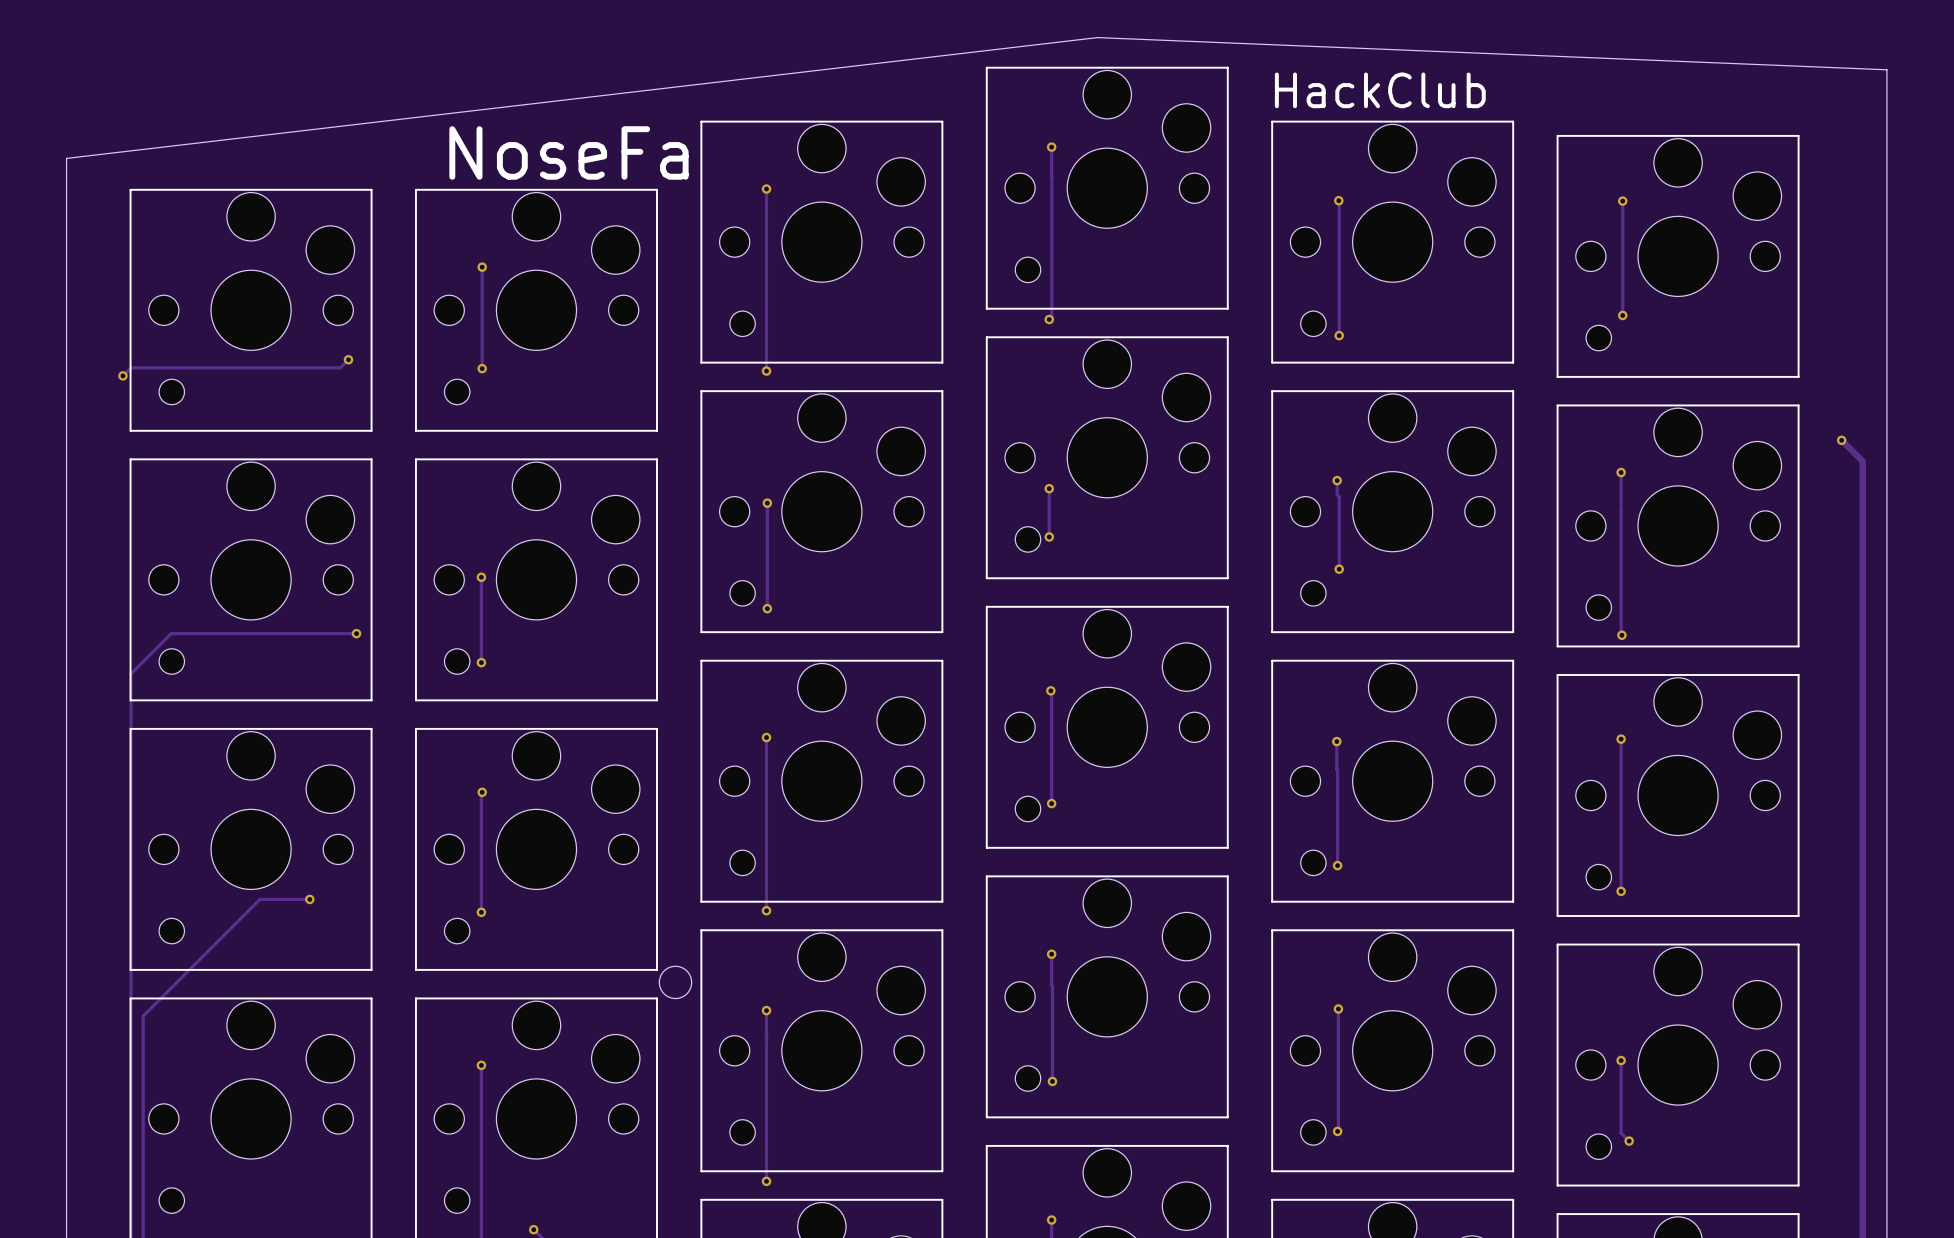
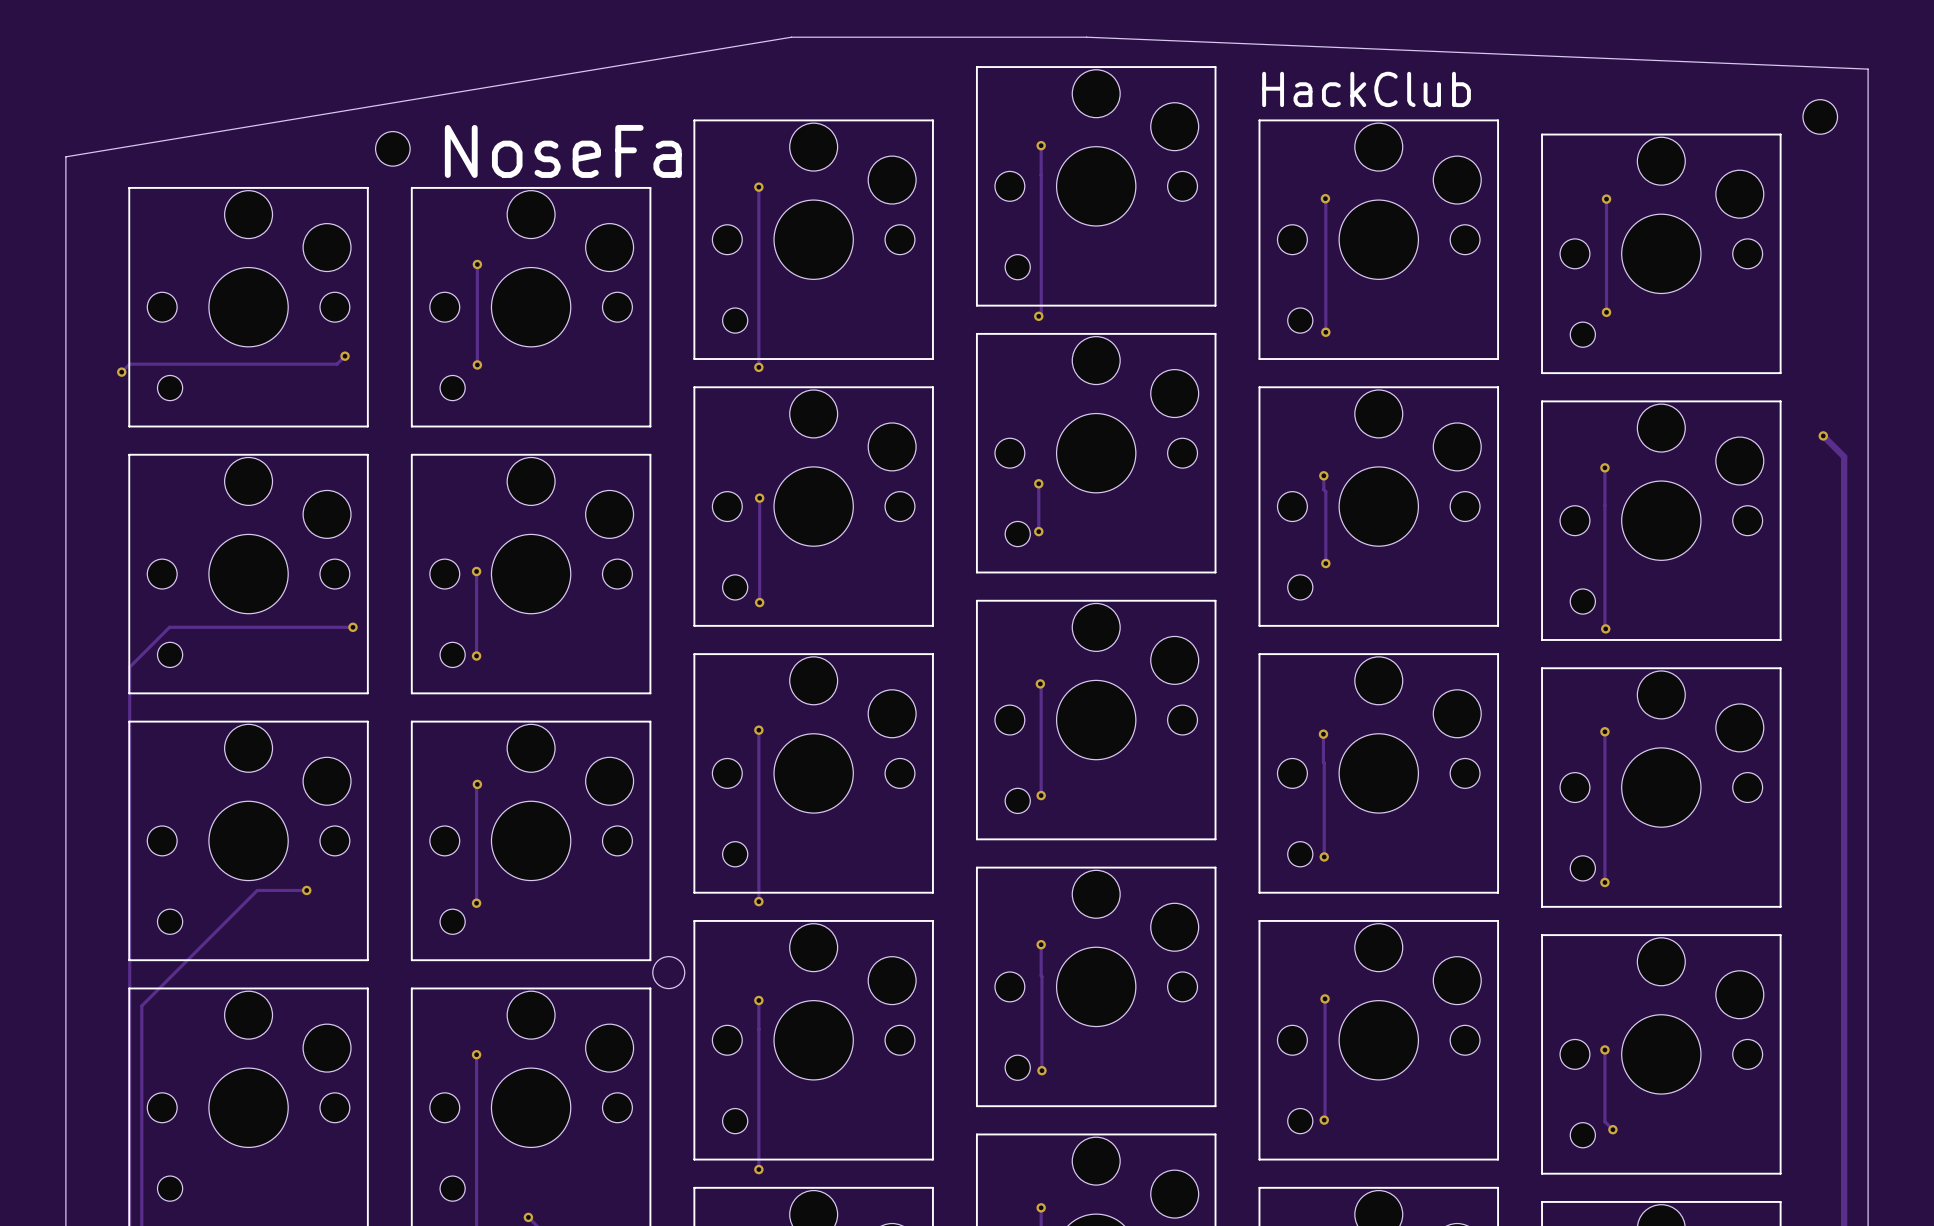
board edge: (1097, 37) (66, 158) -> (1086, 37) (791, 37) (65, 156)
part: none -> (1820, 116)
part: none -> (392, 148)

